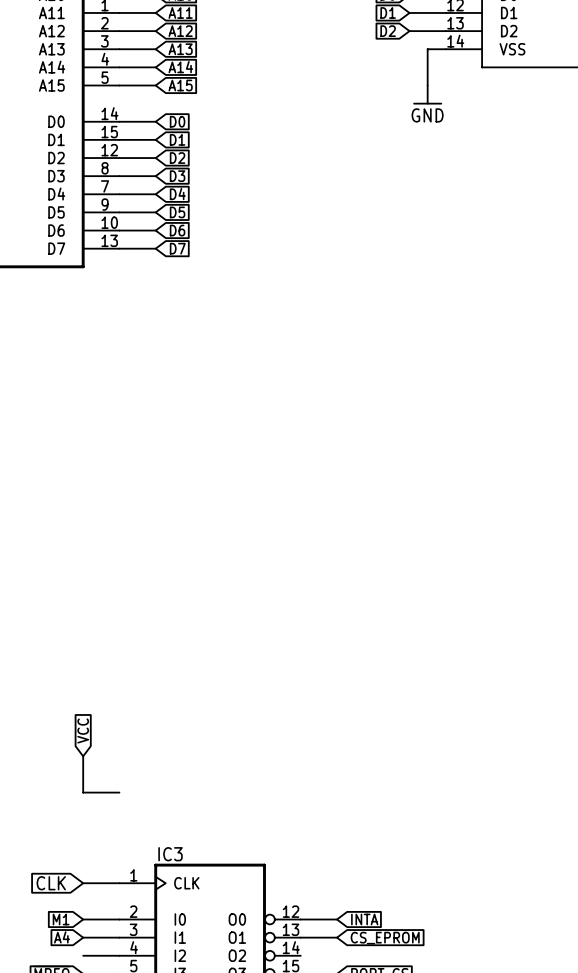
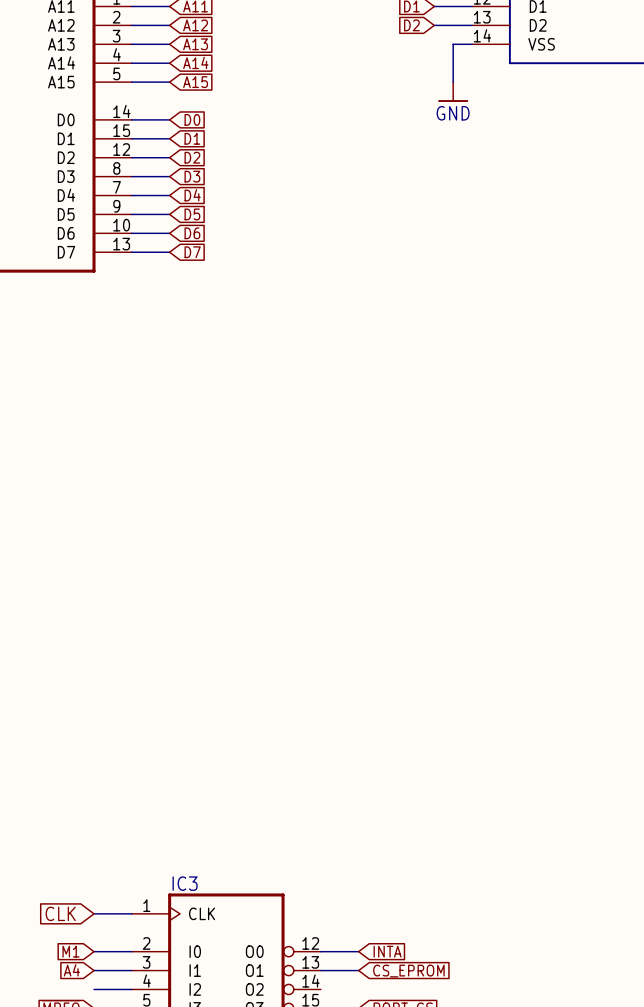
global label: VCC (83, 730) -> none
wire: (83, 756) (83, 792) (119, 792) -> none

